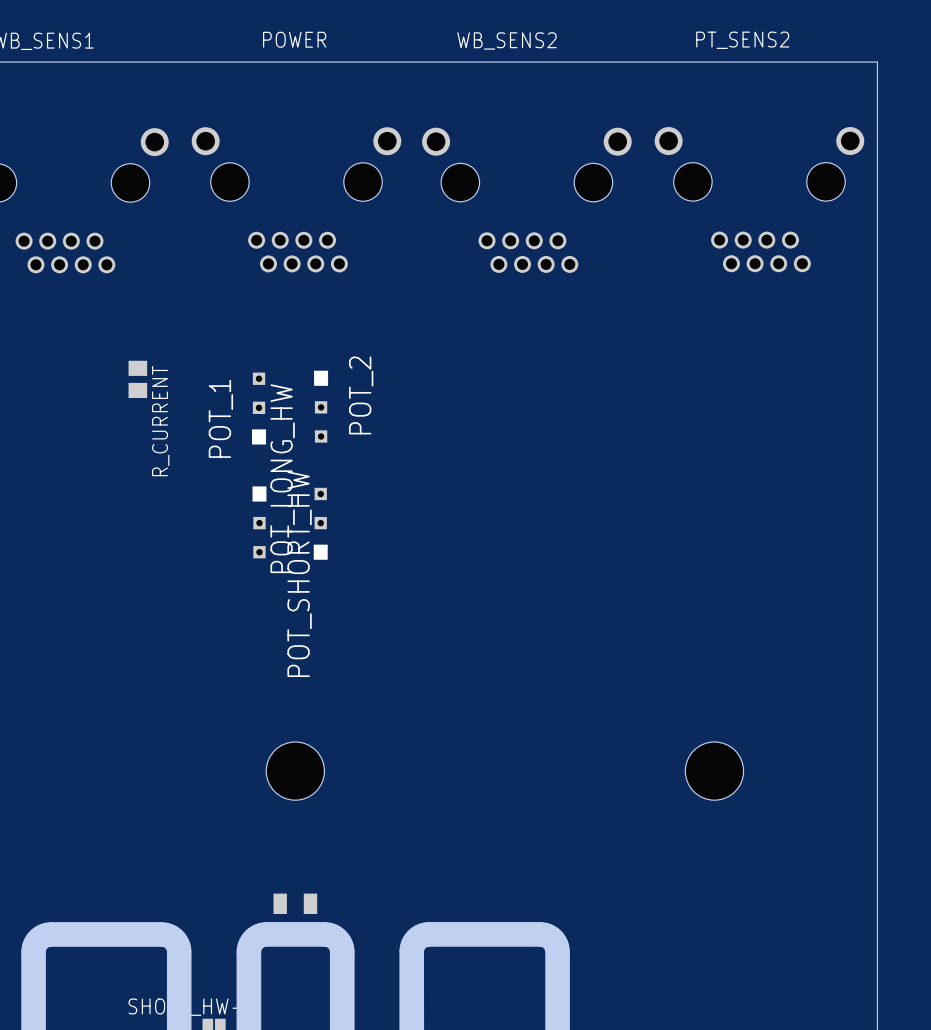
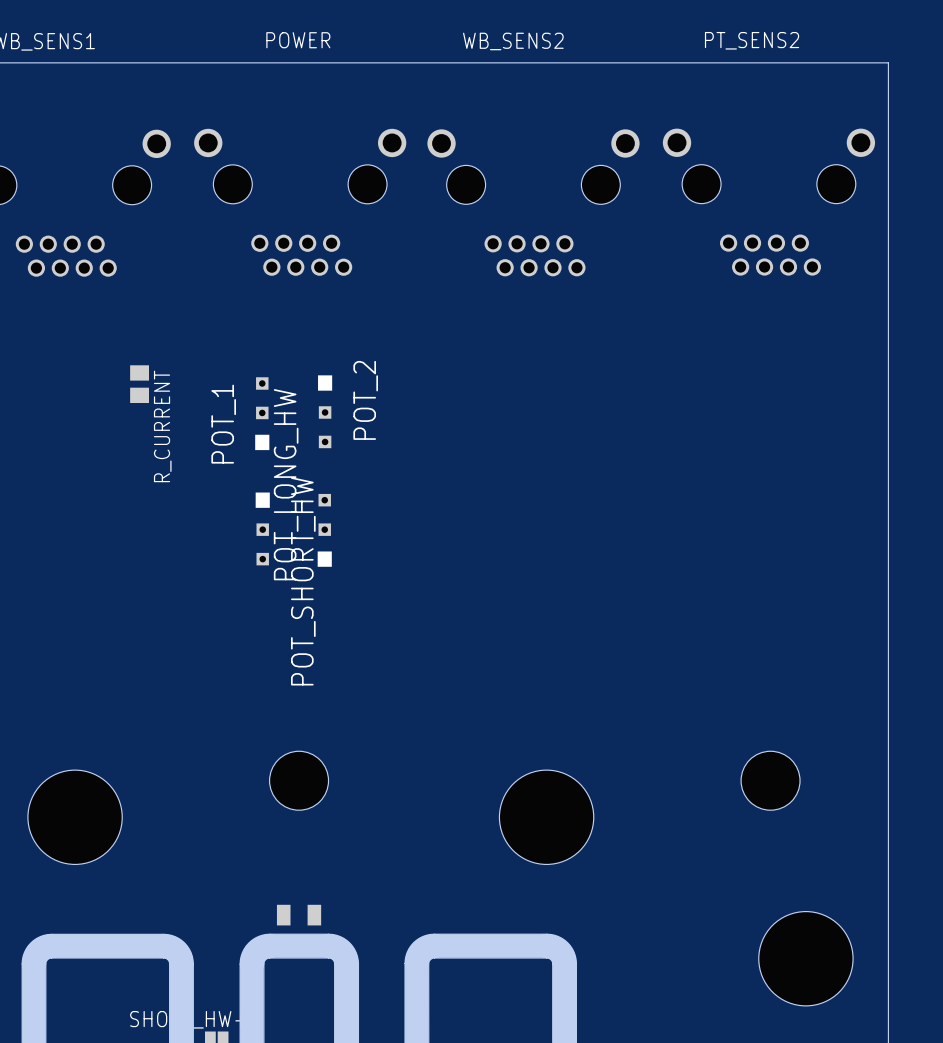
hole position: (714, 771) -> (770, 780)
hole: none -> (75, 817)
hole: none -> (546, 817)
hole: none -> (805, 958)

